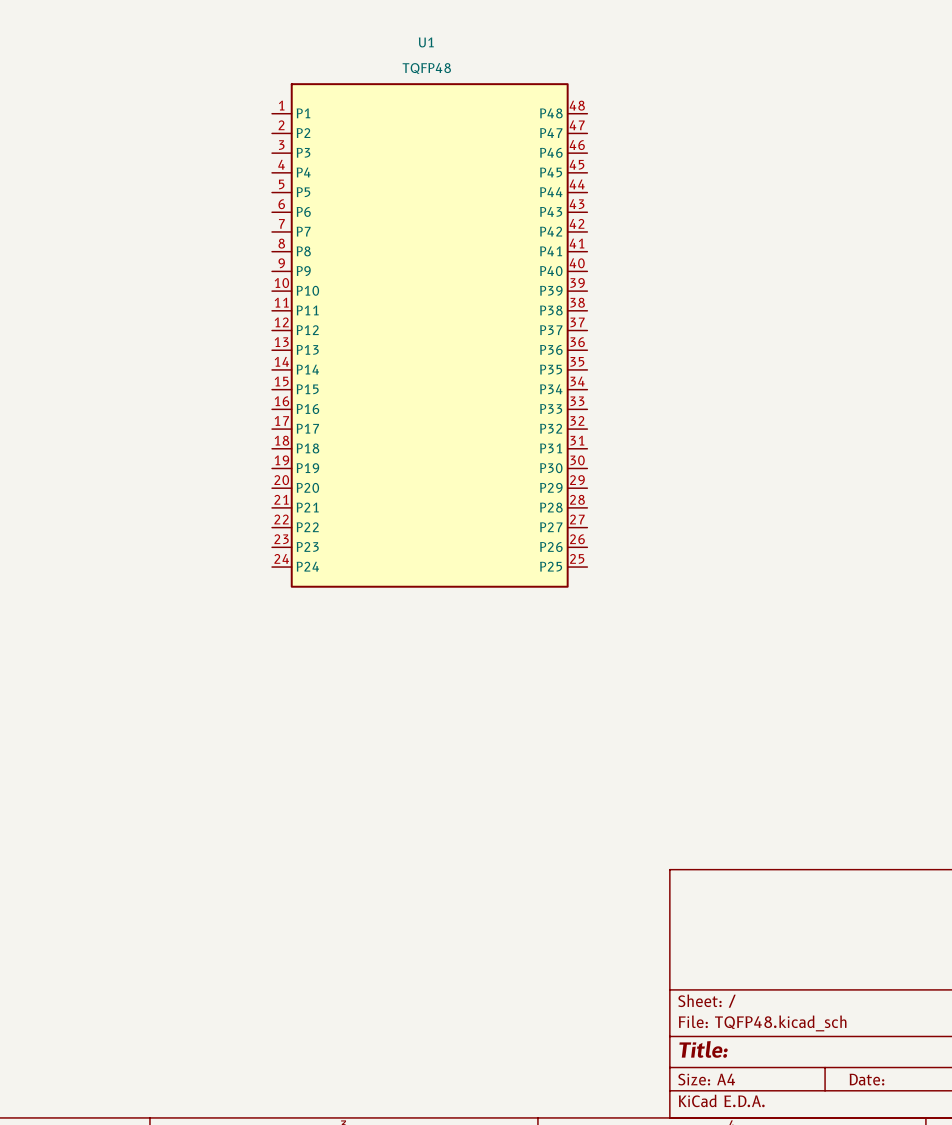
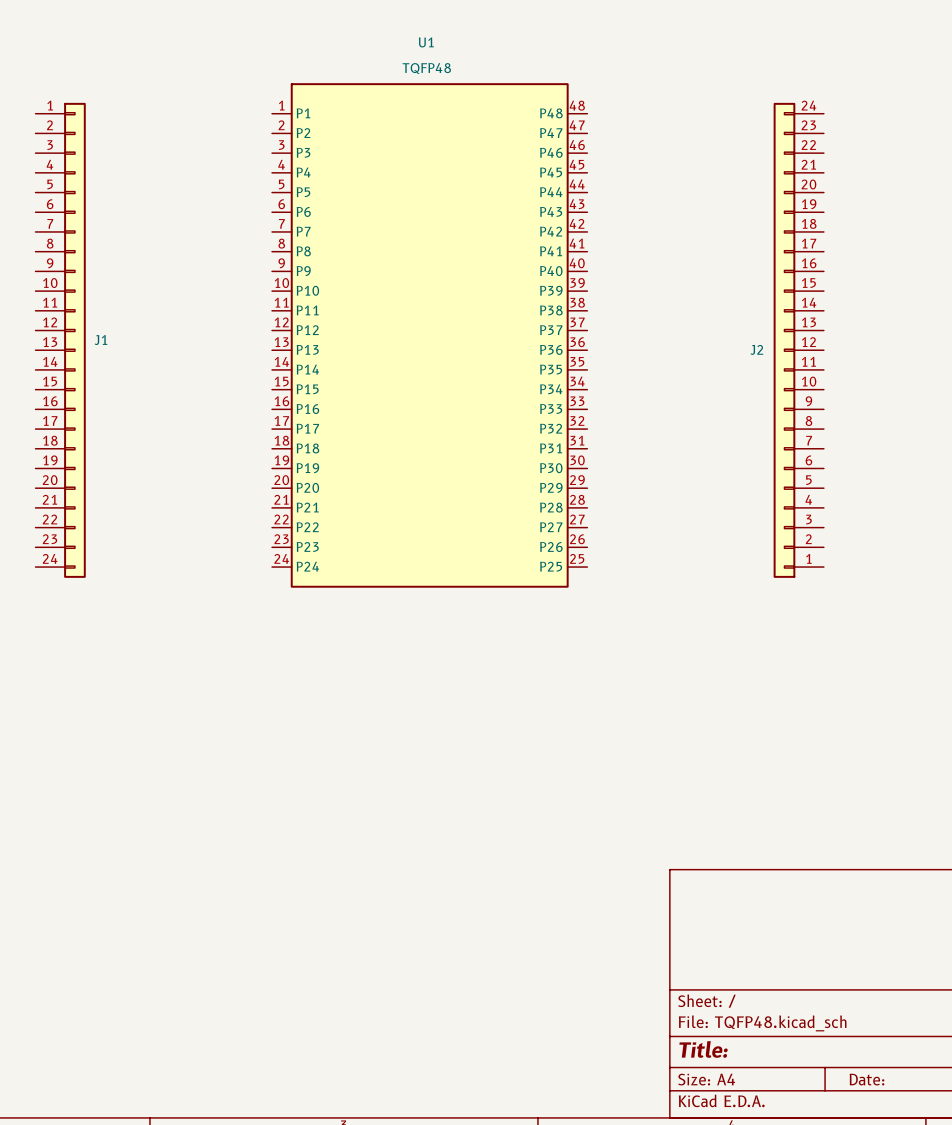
J1: none -> (60, 340)
J2: none -> (798, 340)

